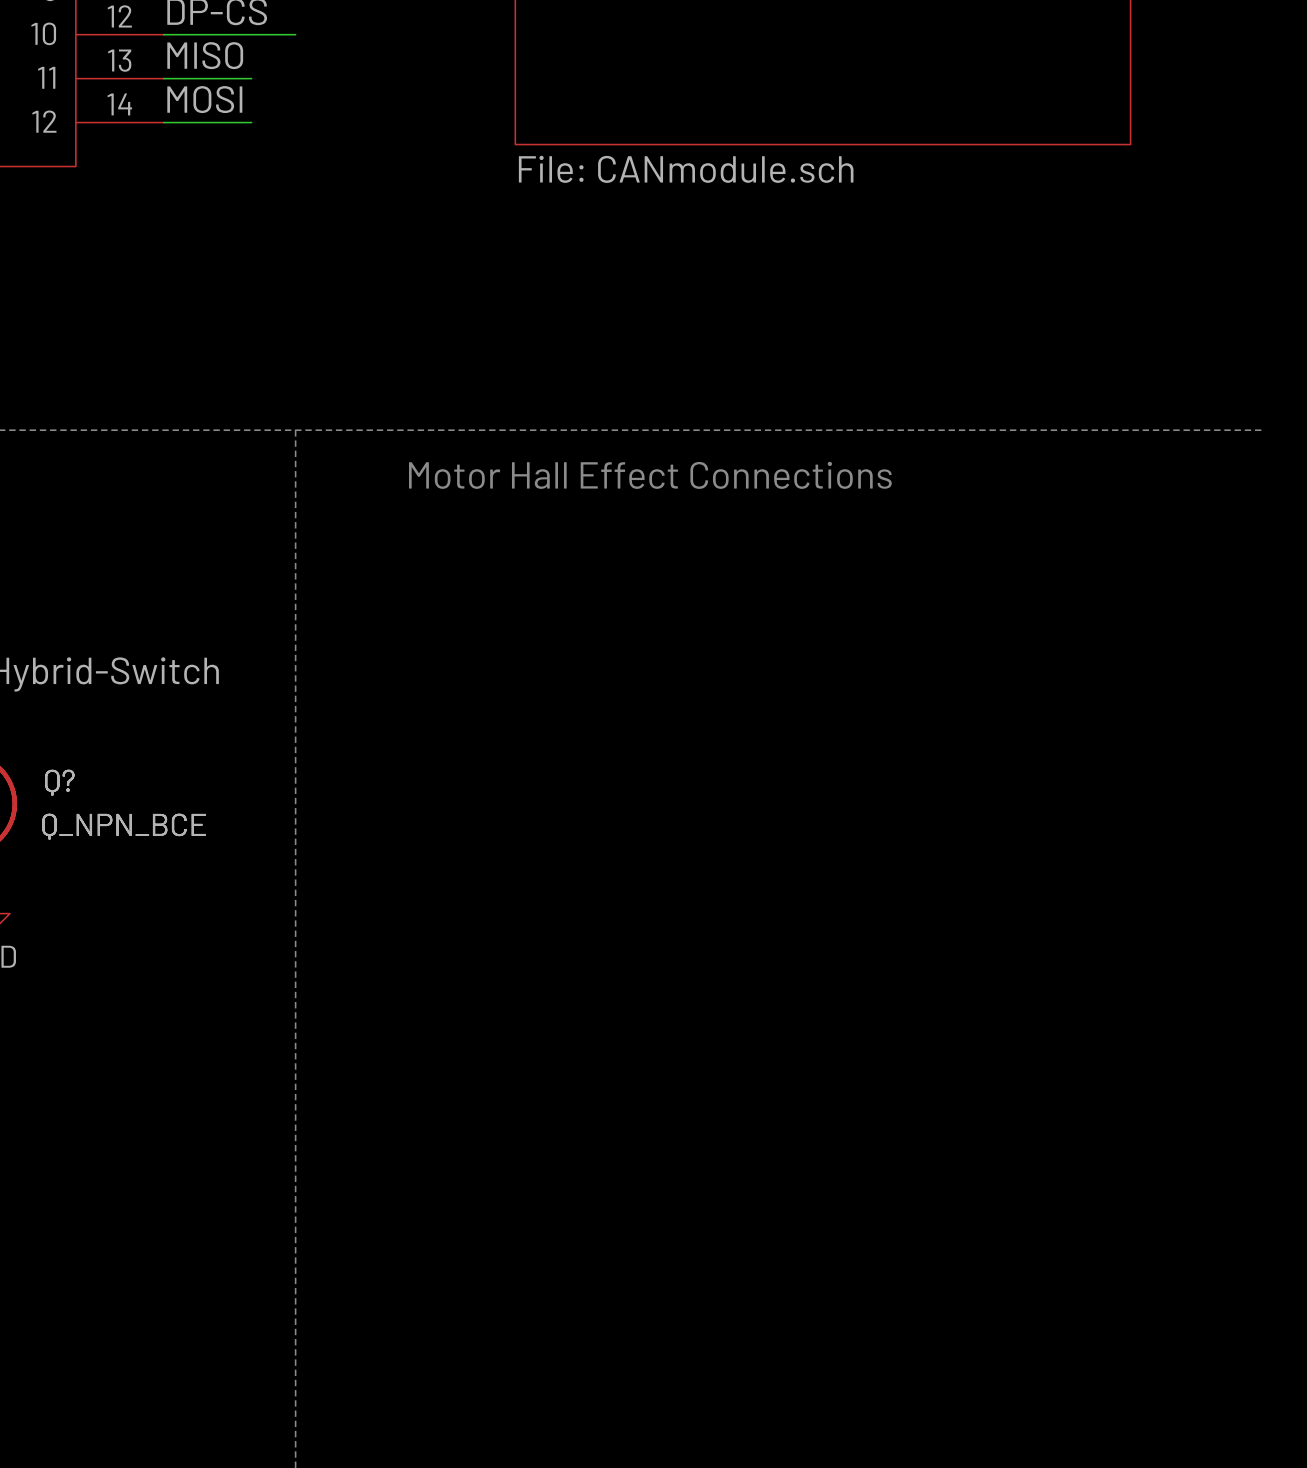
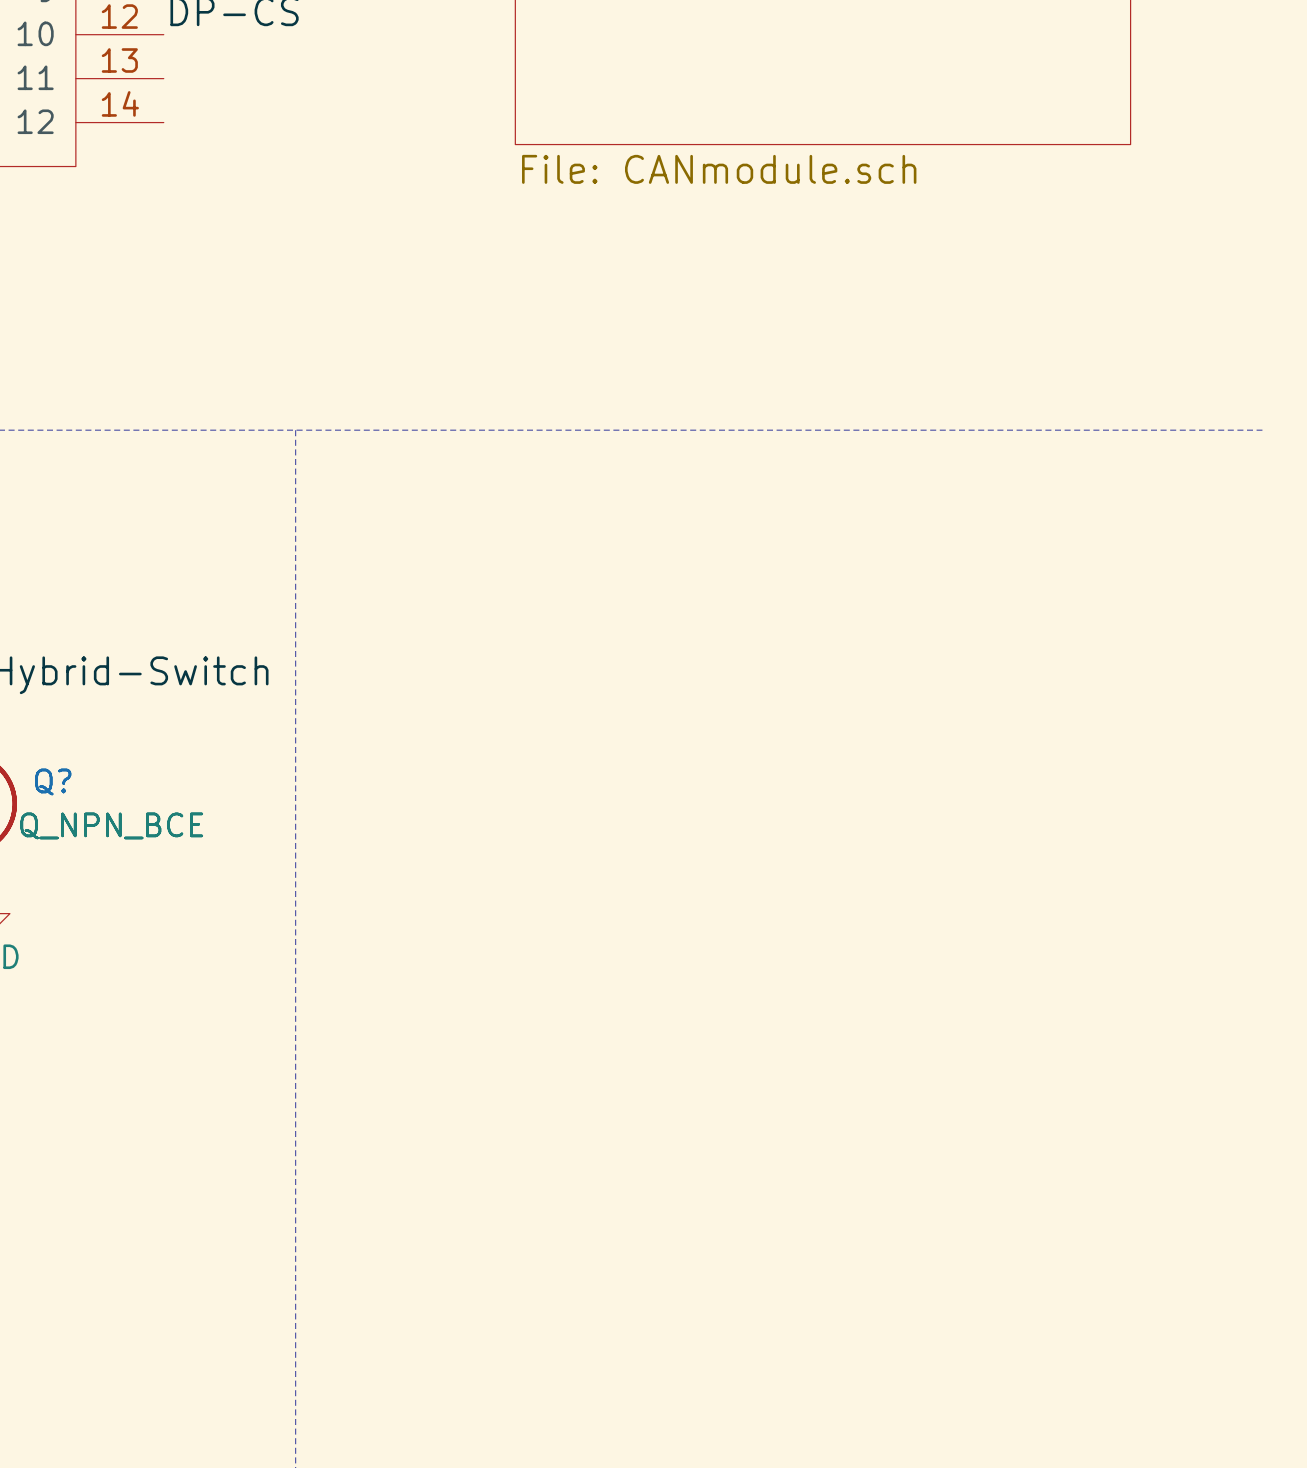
wire: (163, 34) (295, 34) -> none
label: MISO (205, 55) -> none
wire: (163, 78) (251, 78) -> none
label: MOSI (204, 99) -> none
wire: (163, 122) (251, 122) -> none
text: Motor Hall Effect Connections (650, 475) -> none

